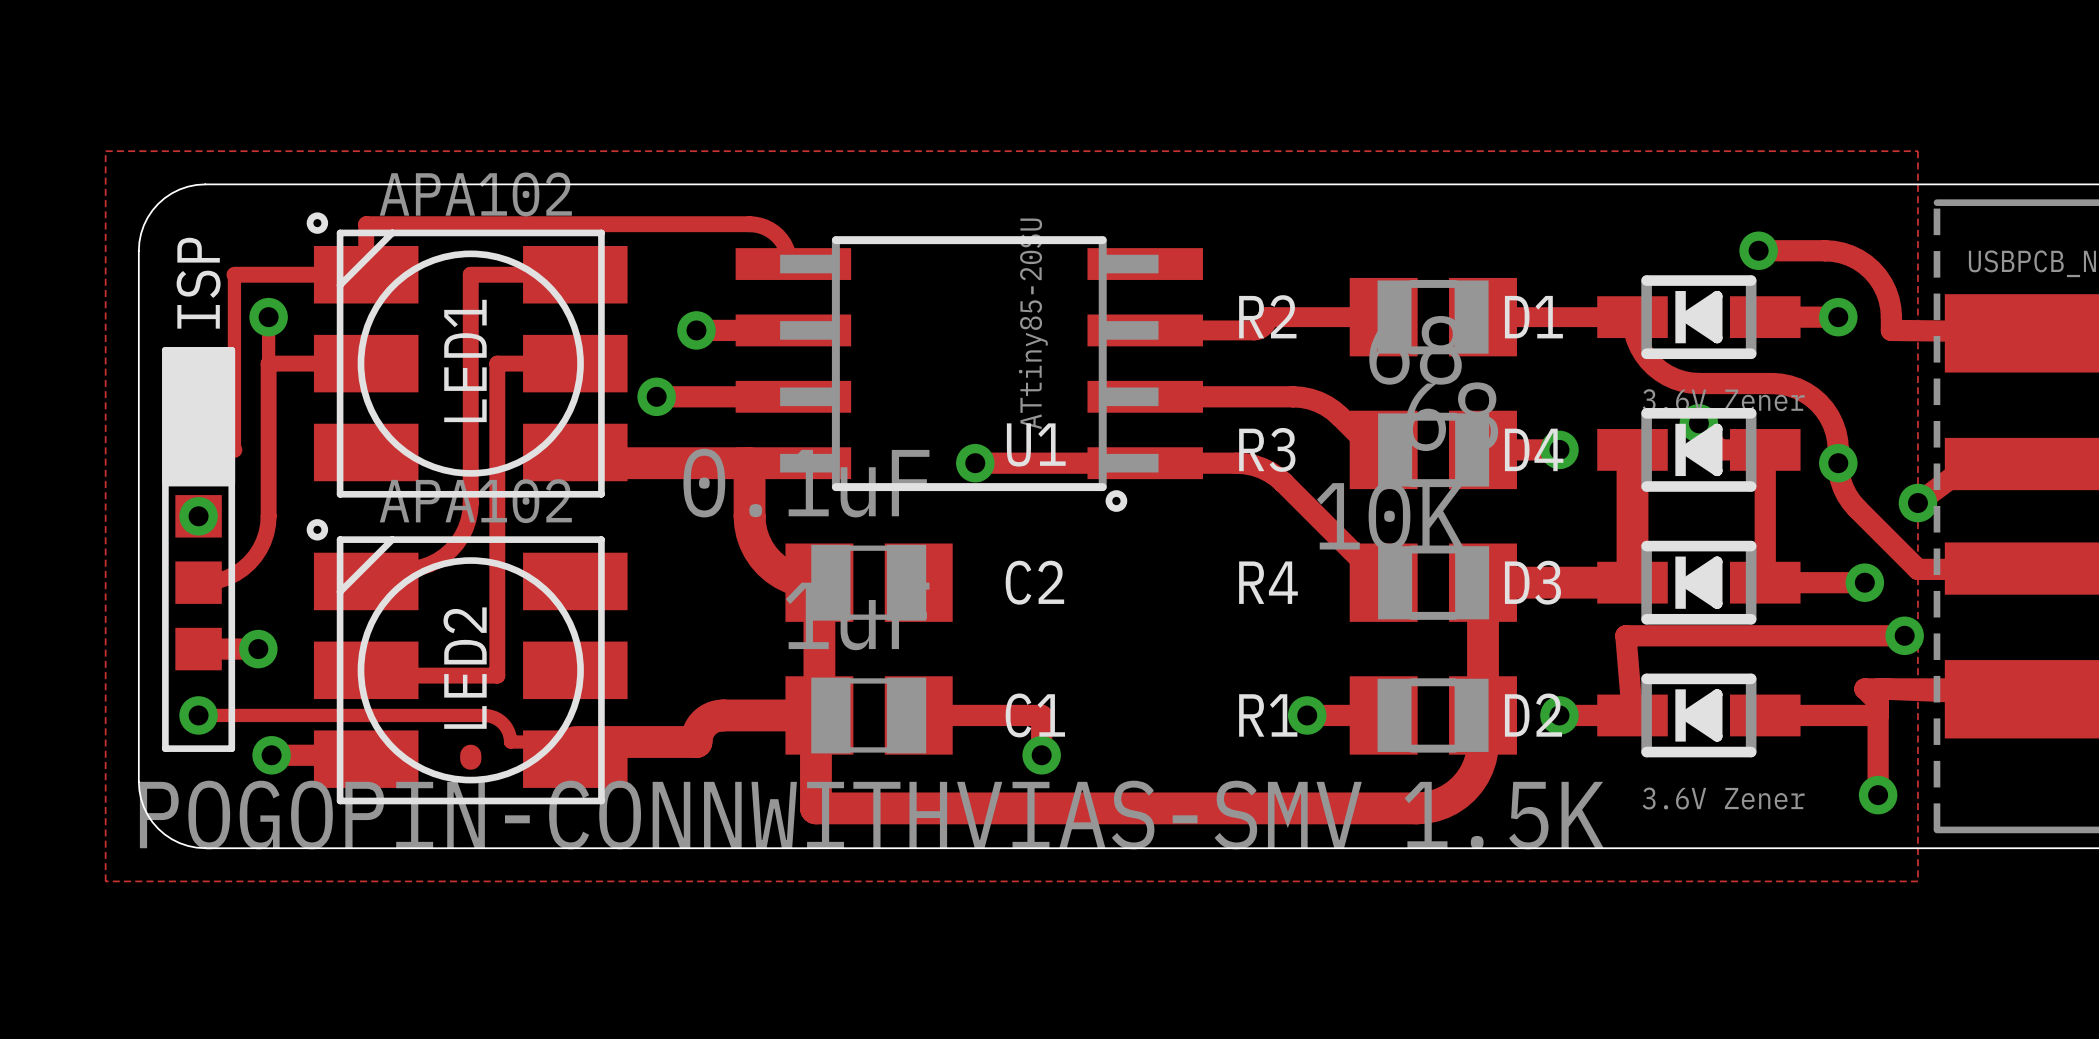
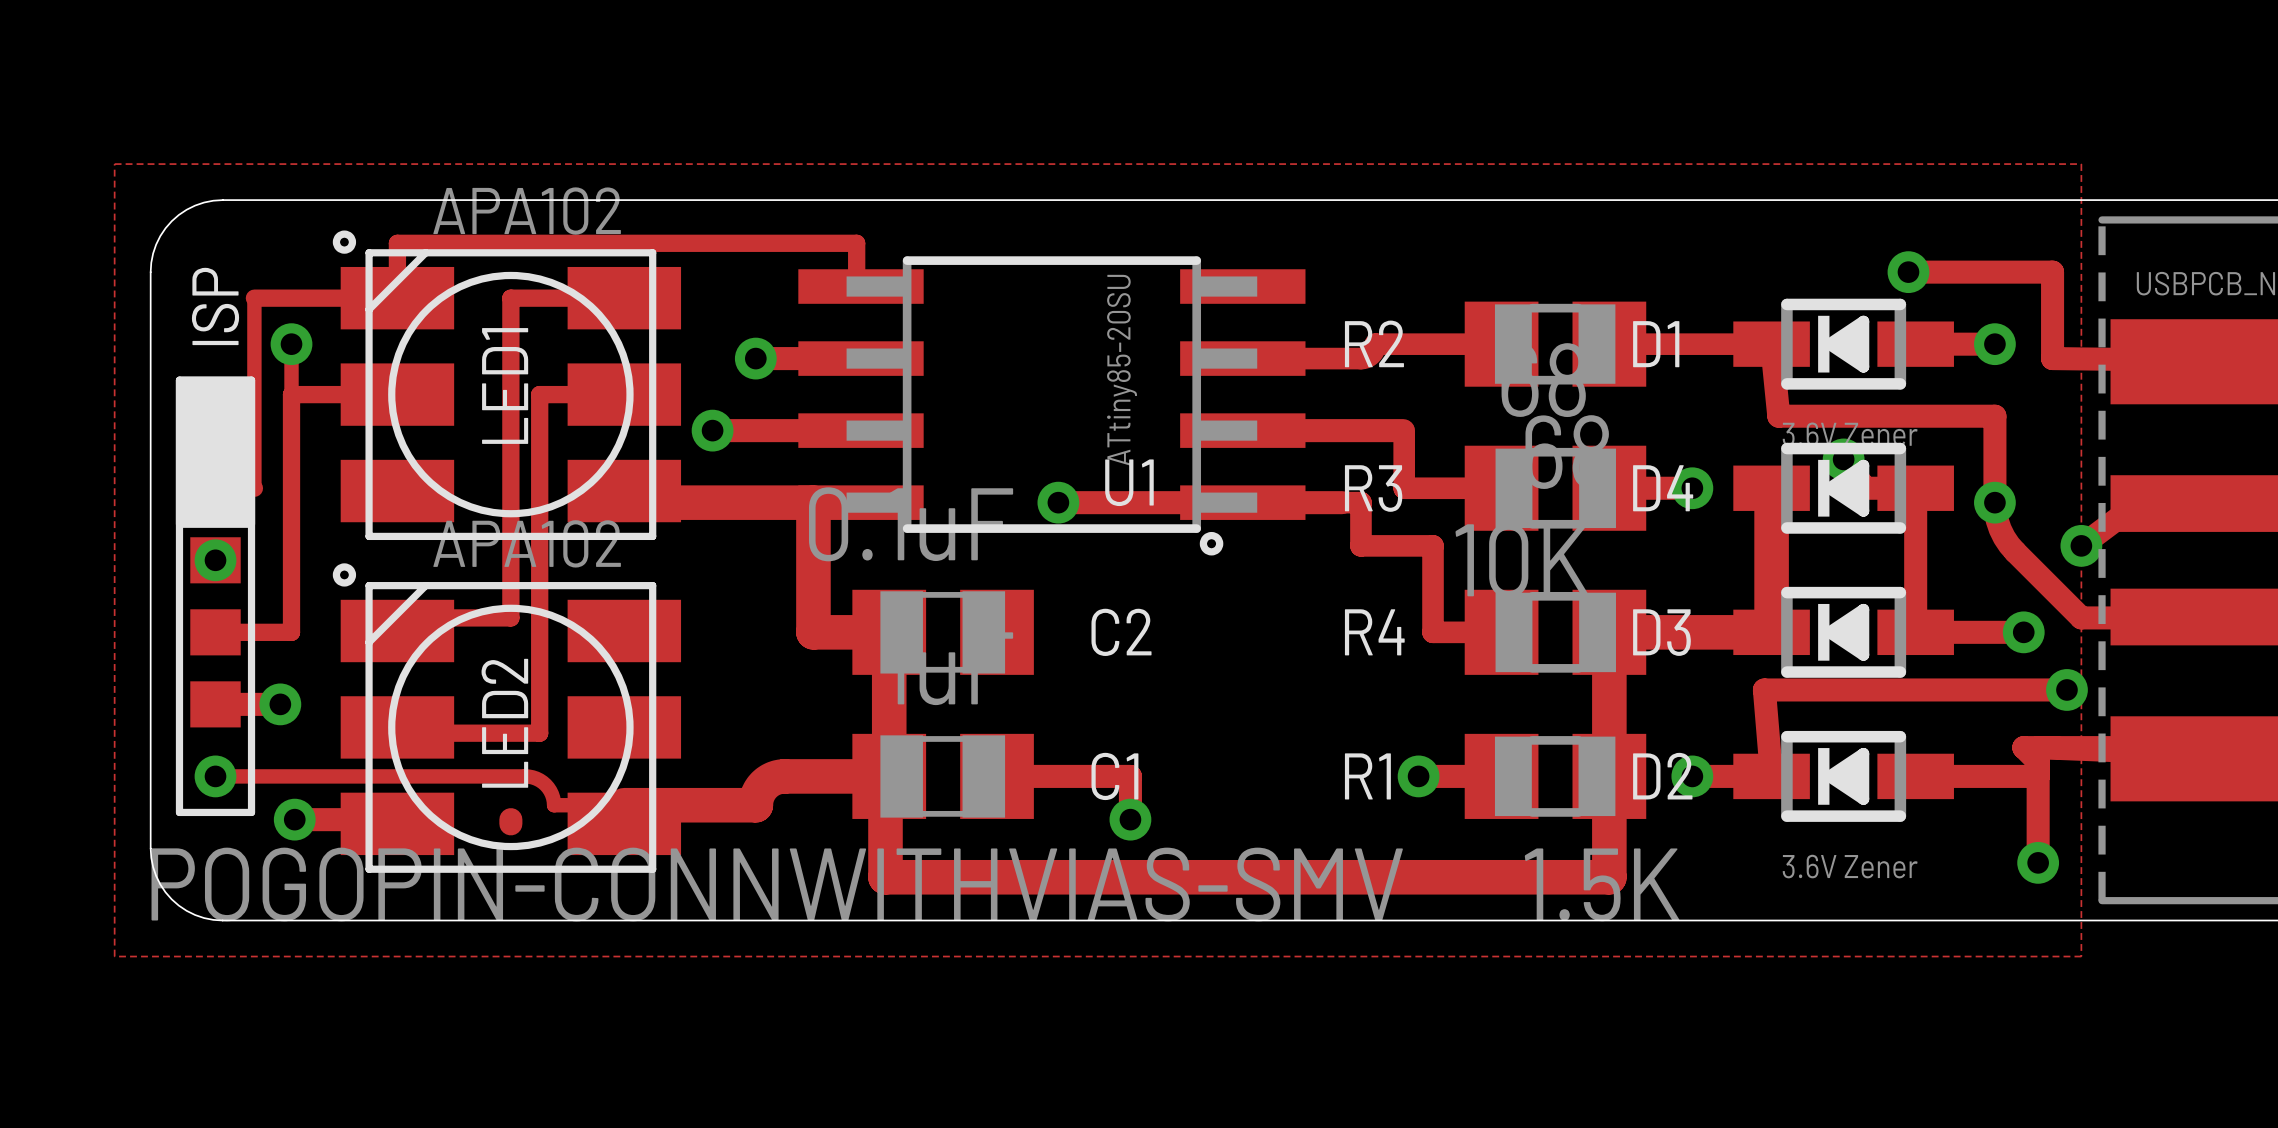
track: (749, 224) (764, 227) (777, 235) (786, 248) (789, 264) -> (813, 243) (856, 243) (856, 286)
track: (1825, 250) (1850, 255) (1871, 270) (1886, 291) (1891, 317) -> (1980, 272) (2052, 272) (2052, 344)
track: (1633, 323) (1639, 347) (1654, 366) (1675, 379) (1699, 383) -> (1772, 351) (1778, 416) (1844, 416)
track: (1771, 383) (1797, 388) (1818, 402) (1833, 424) (1838, 449) -> (1922, 416) (1994, 416) (1994, 488)
track: (1292, 396) (1310, 399) (1326, 405) (1339, 416) (1373, 449) -> (1404, 430) (1404, 488) (1490, 488)
track: (1236, 463) (1253, 465) (1277, 476) (1383, 582) -> (1342, 502) (1360, 502) (1360, 545) (1433, 545) (1433, 632) (1501, 632)
track: (470, 503) (465, 528) (451, 549) (429, 564) (404, 569) -> (510, 545) (510, 617) (438, 617)
track: (268, 516) (263, 541) (249, 563) (227, 577) (202, 582) -> (291, 560) (291, 632) (219, 632)
track: (749, 516) (754, 541) (769, 563) (790, 577) (815, 582) -> (813, 560) (813, 632) (885, 632)
track: (1483, 742) (1477, 767) (1463, 788) (1442, 803) (1416, 808) -> (1609, 805) (1609, 877) (1537, 877)

